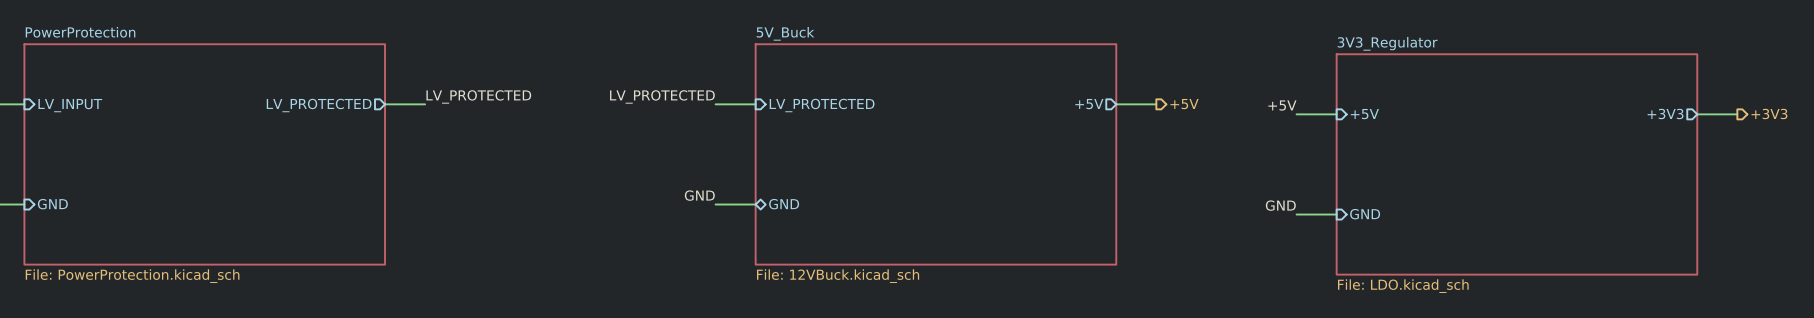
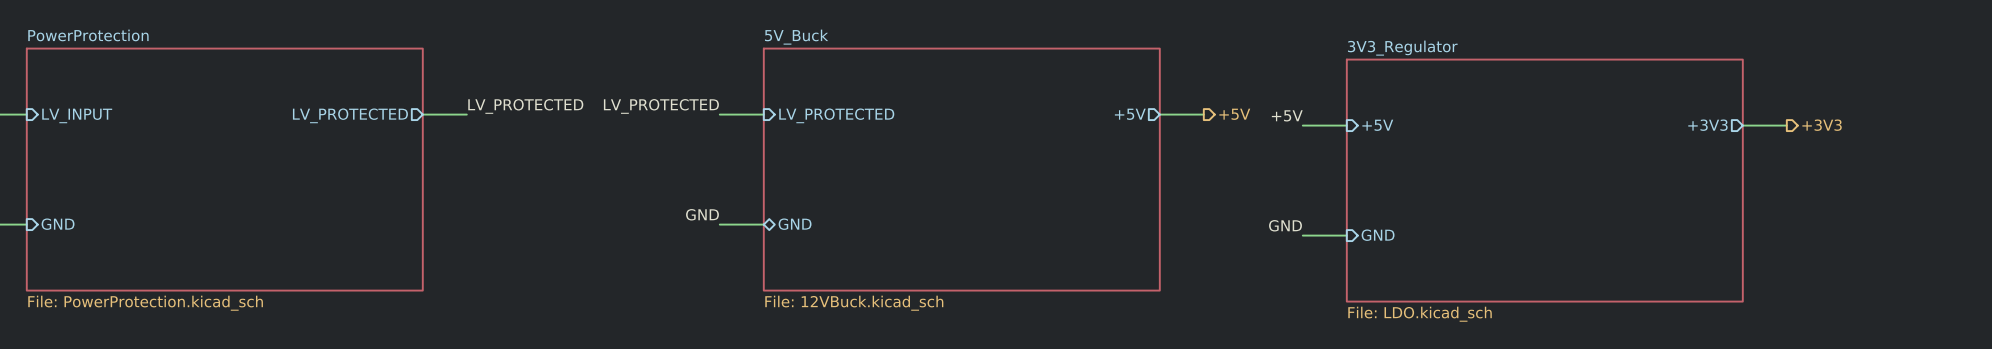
label position: LV_PROTECTED (662, 96) -> LV_PROTECTED (661, 106)
wire: (715, 104) (755, 104) -> (719, 114) (763, 114)
sheet pin position: +5V (1089, 104) -> +5V (1130, 114)
wire: (1116, 104) (1156, 104) -> (1159, 114) (1203, 114)
hierarchical label position: +5V (1184, 104) -> +5V (1234, 114)
sheet pin position: LV_PROTECTED (822, 105) -> LV_PROTECTED (836, 115)
label position: +5V (1282, 105) -> +5V (1287, 115)
sheet pin position: +3V3 (1665, 113) -> +3V3 (1707, 125)
hierarchical label position: +3V3 (1769, 113) -> +3V3 (1822, 125)
sheet pin: none -> +5V (1377, 125)
wire: (1296, 114) (1336, 114) -> (1302, 125) (1346, 125)
sheet pin: +5V (1364, 114) -> none
wire: (1697, 114) (1737, 114) -> (1742, 125) (1786, 125)
sheet 5V_Buck position: (935, 154) -> (961, 169)
sheet 3V3_Regulator position: (1516, 164) -> (1544, 180)
label position: GND (699, 195) -> GND (702, 214)
wire: (715, 204) (755, 204) -> (719, 224) (763, 224)
sheet pin position: GND (784, 204) -> GND (795, 224)
label position: GND (1280, 205) -> GND (1285, 225)
wire: (1296, 214) (1336, 214) -> (1302, 235) (1346, 235)
sheet pin position: GND (1365, 214) -> GND (1378, 235)

